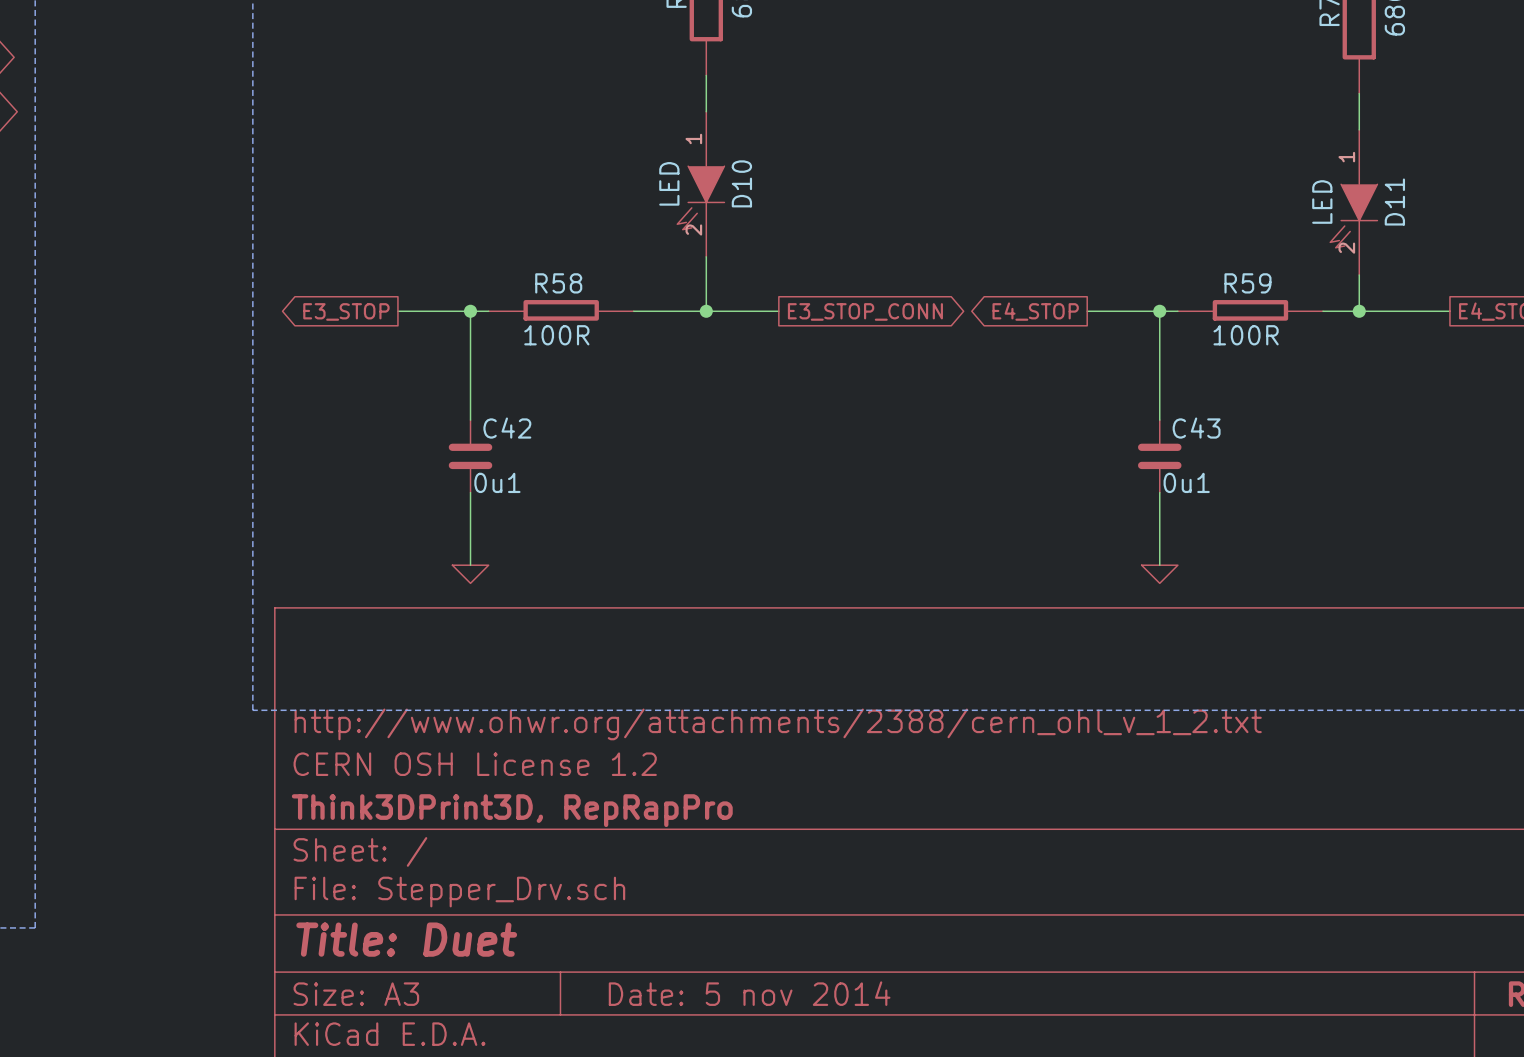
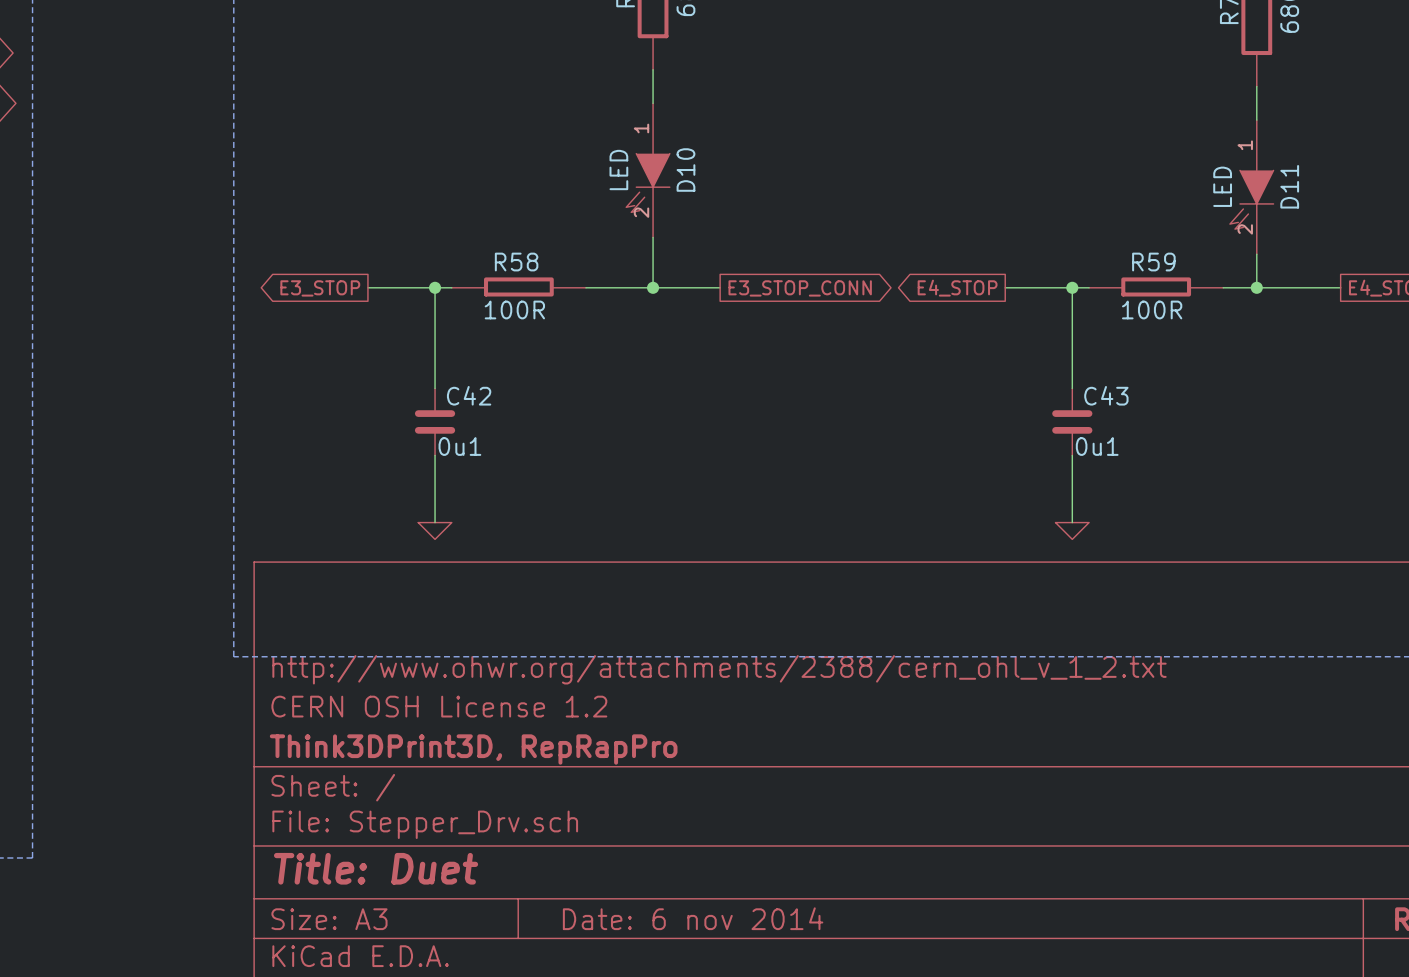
title block: Date: 5 nov 2014 (749, 993) -> Date: 6 nov 2014 (693, 918)

